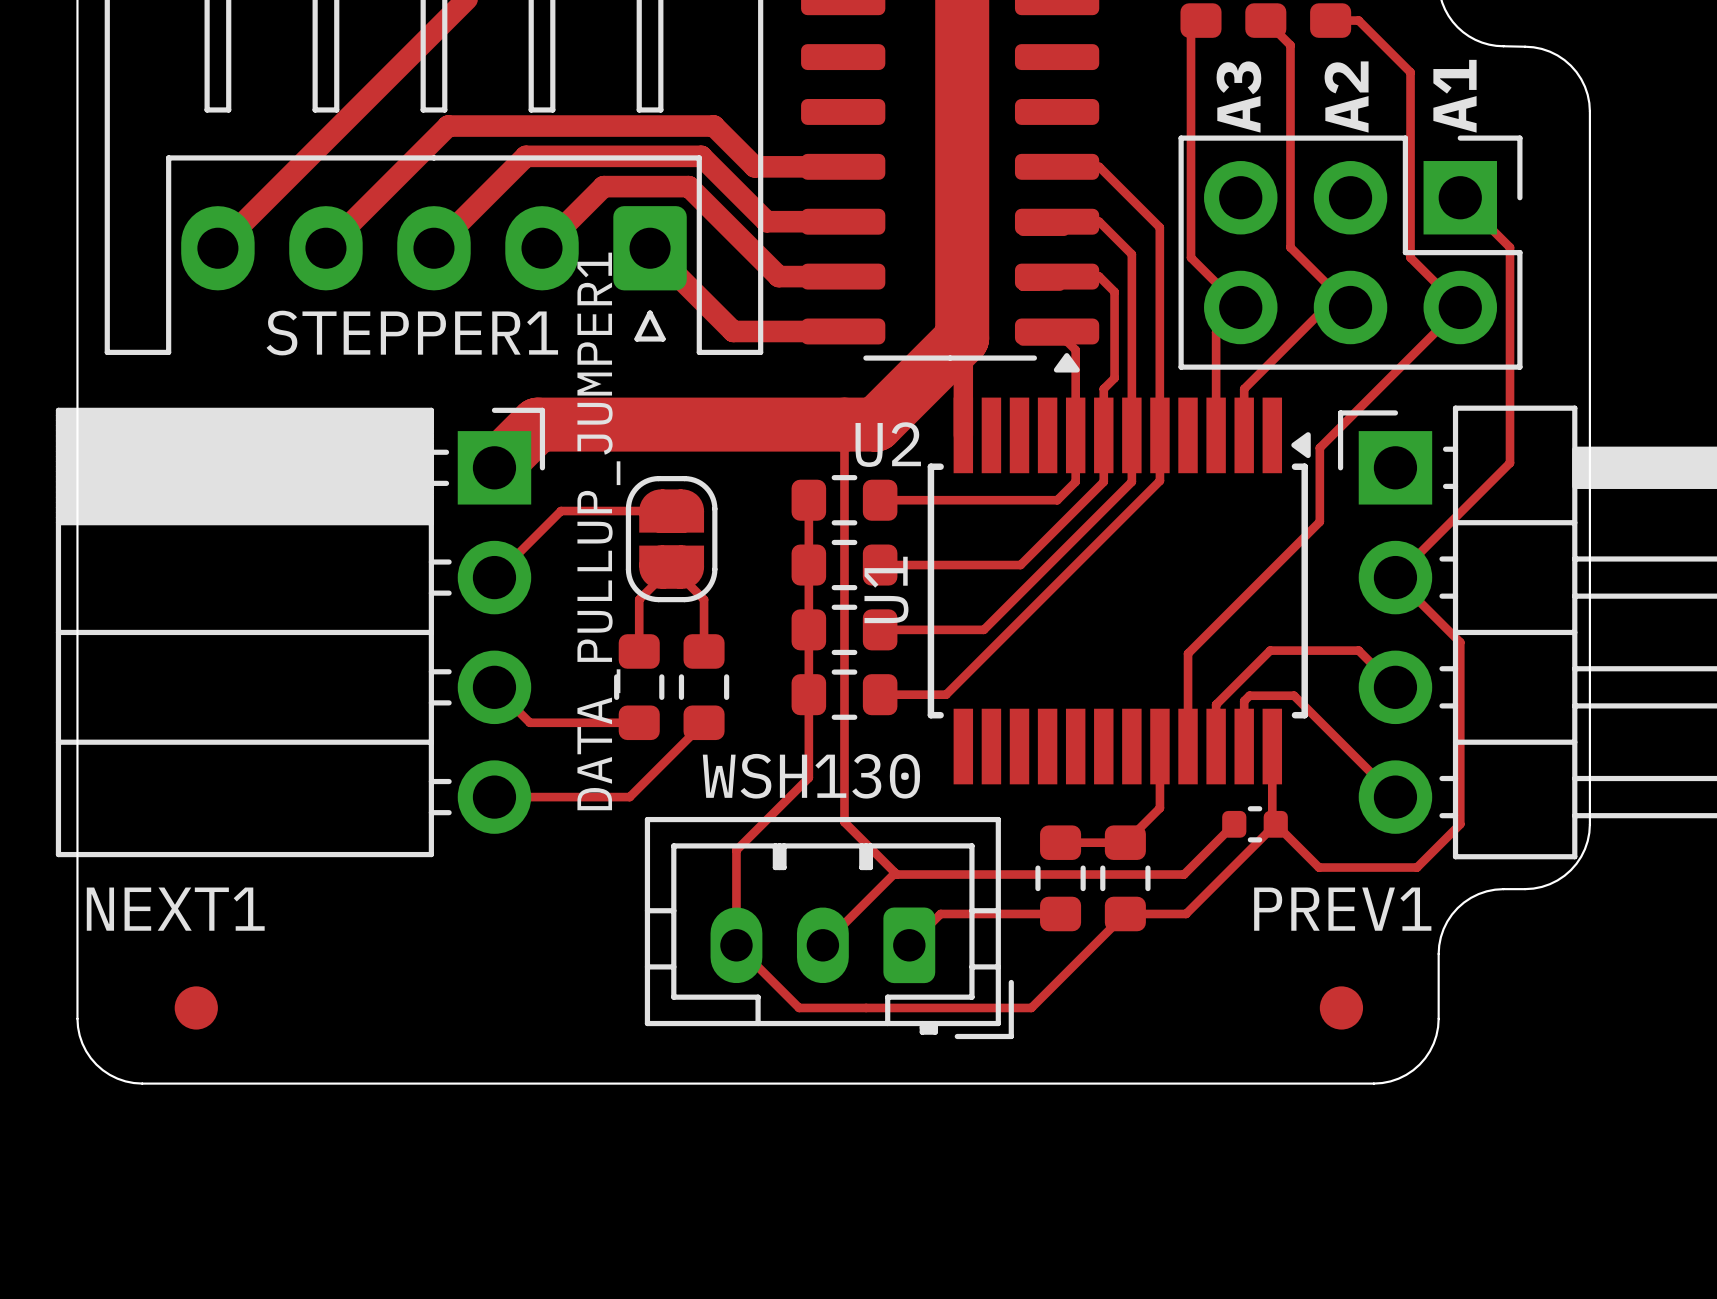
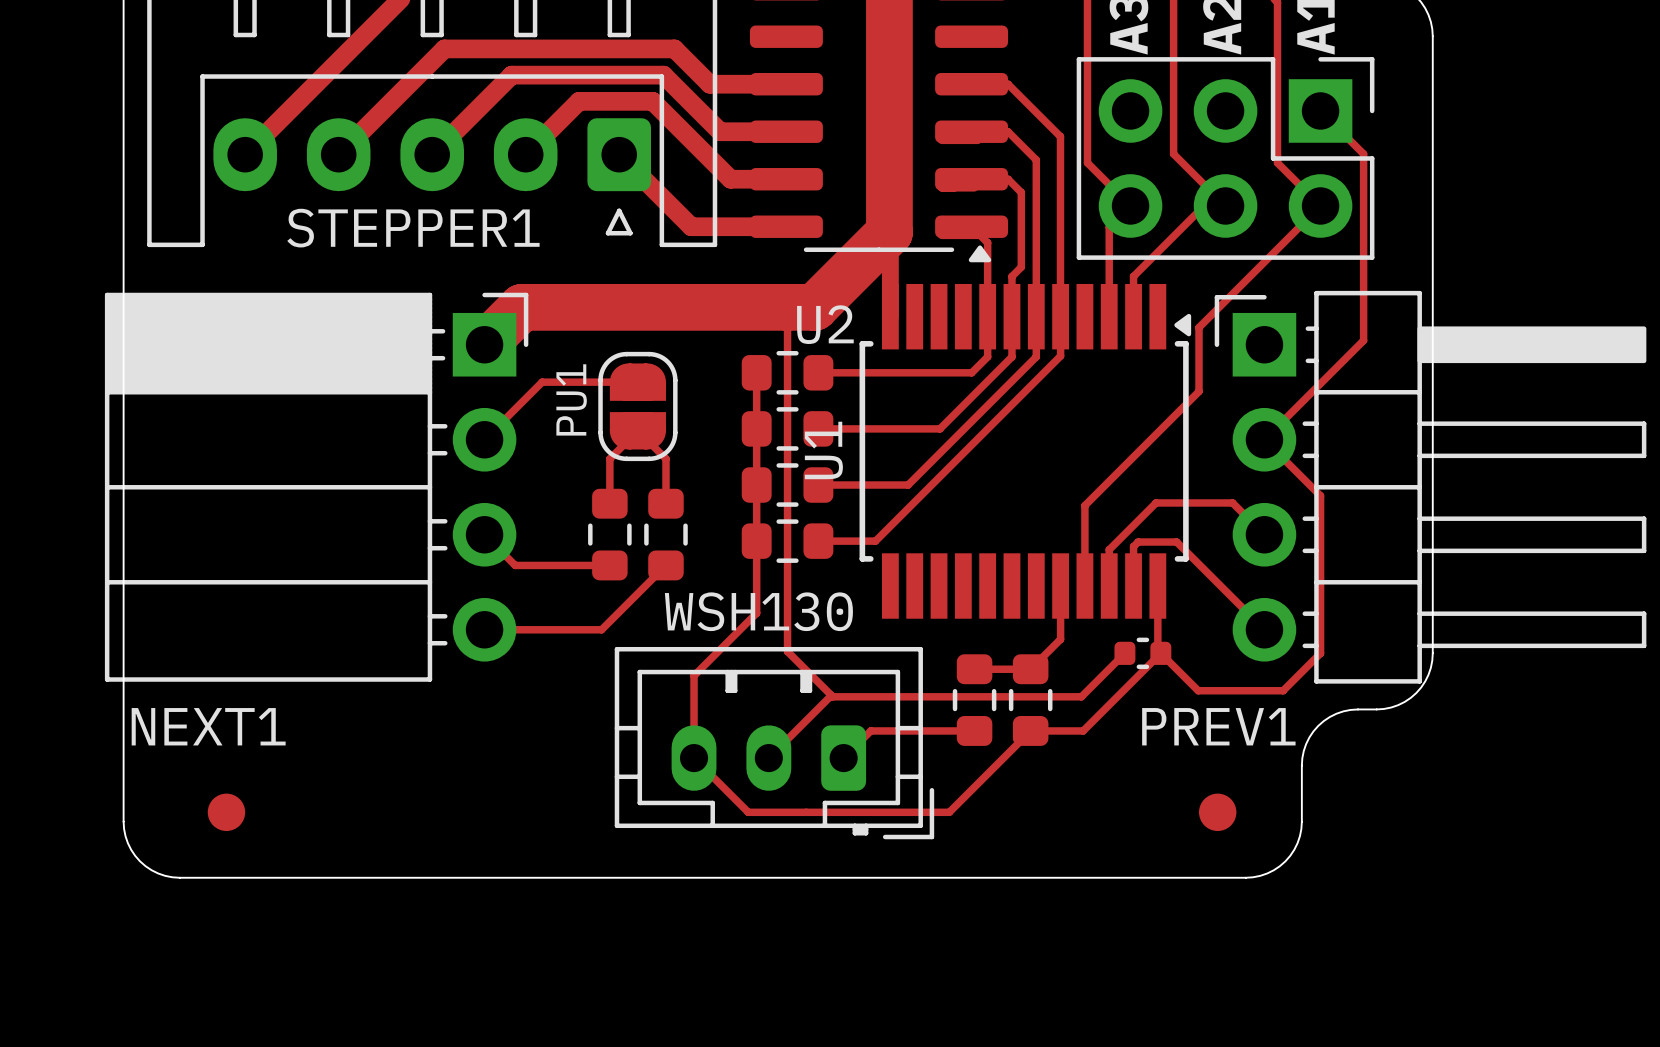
DATA_PULLUP_JUMPER1 name: DATA_PULLUP_JUMPER1 (598, 531) -> PU1 (571, 399)

